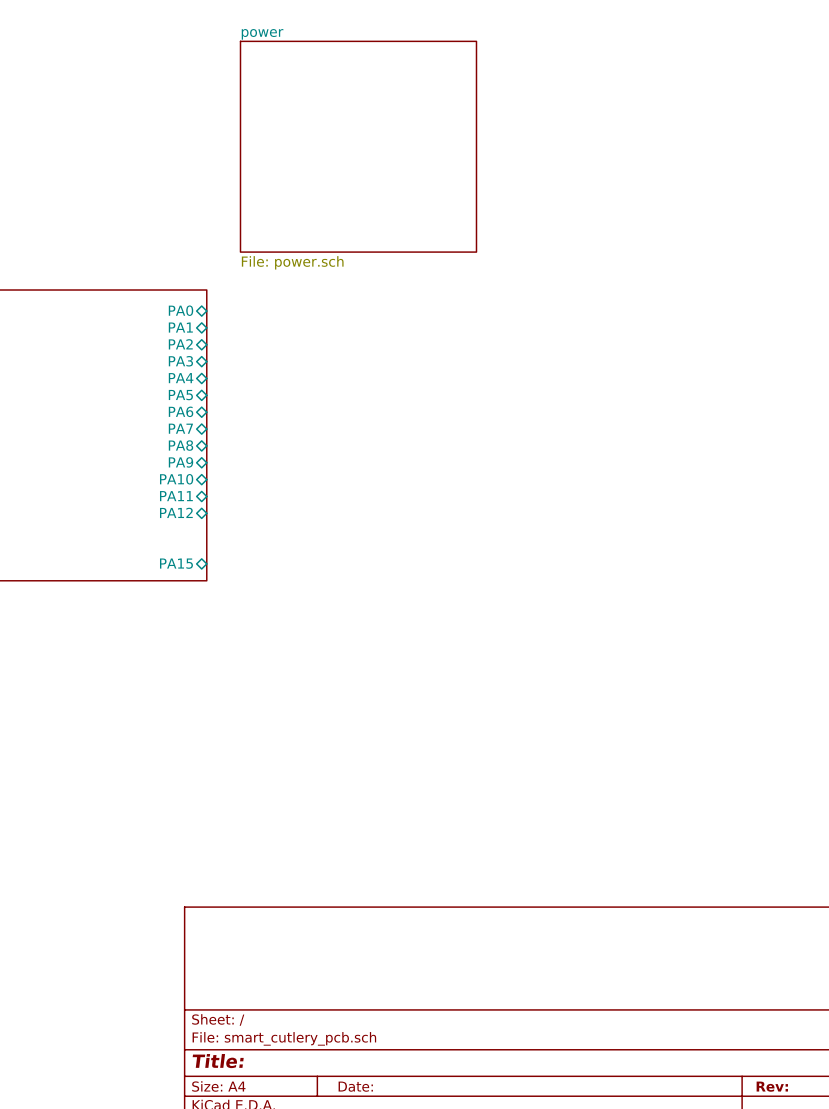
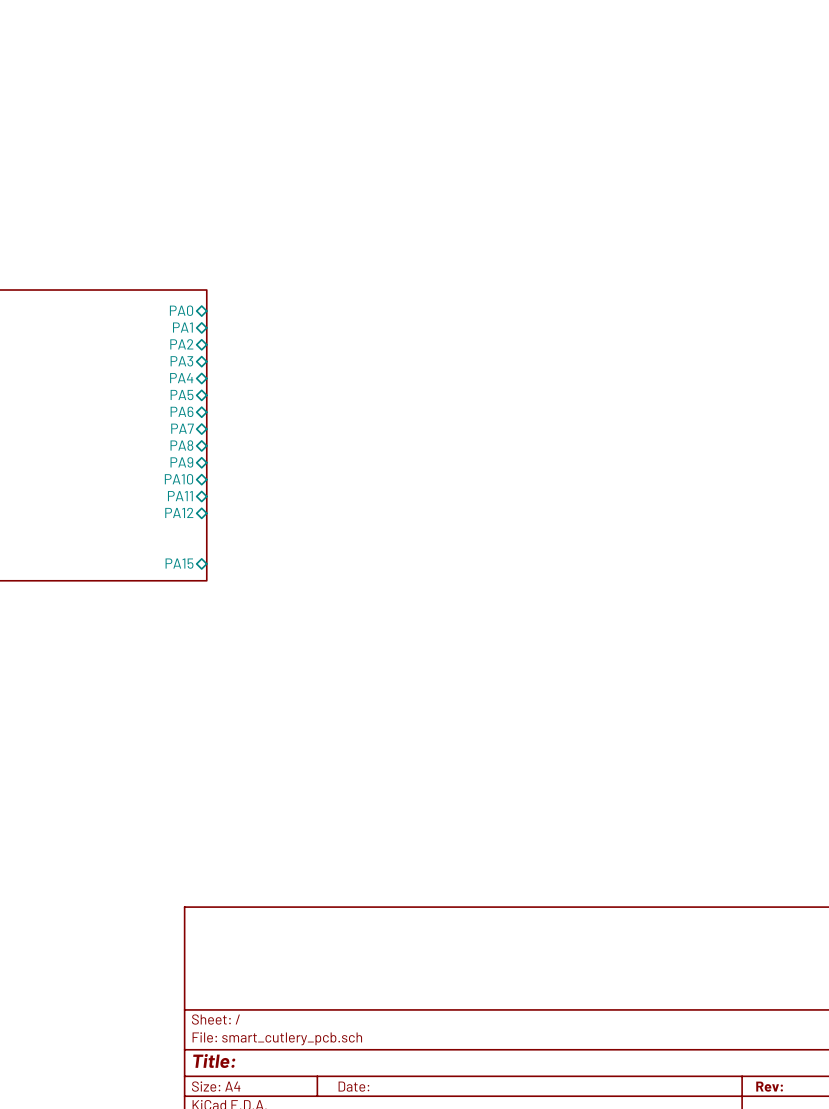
sheet power: File: power.sch (358, 146) -> none

